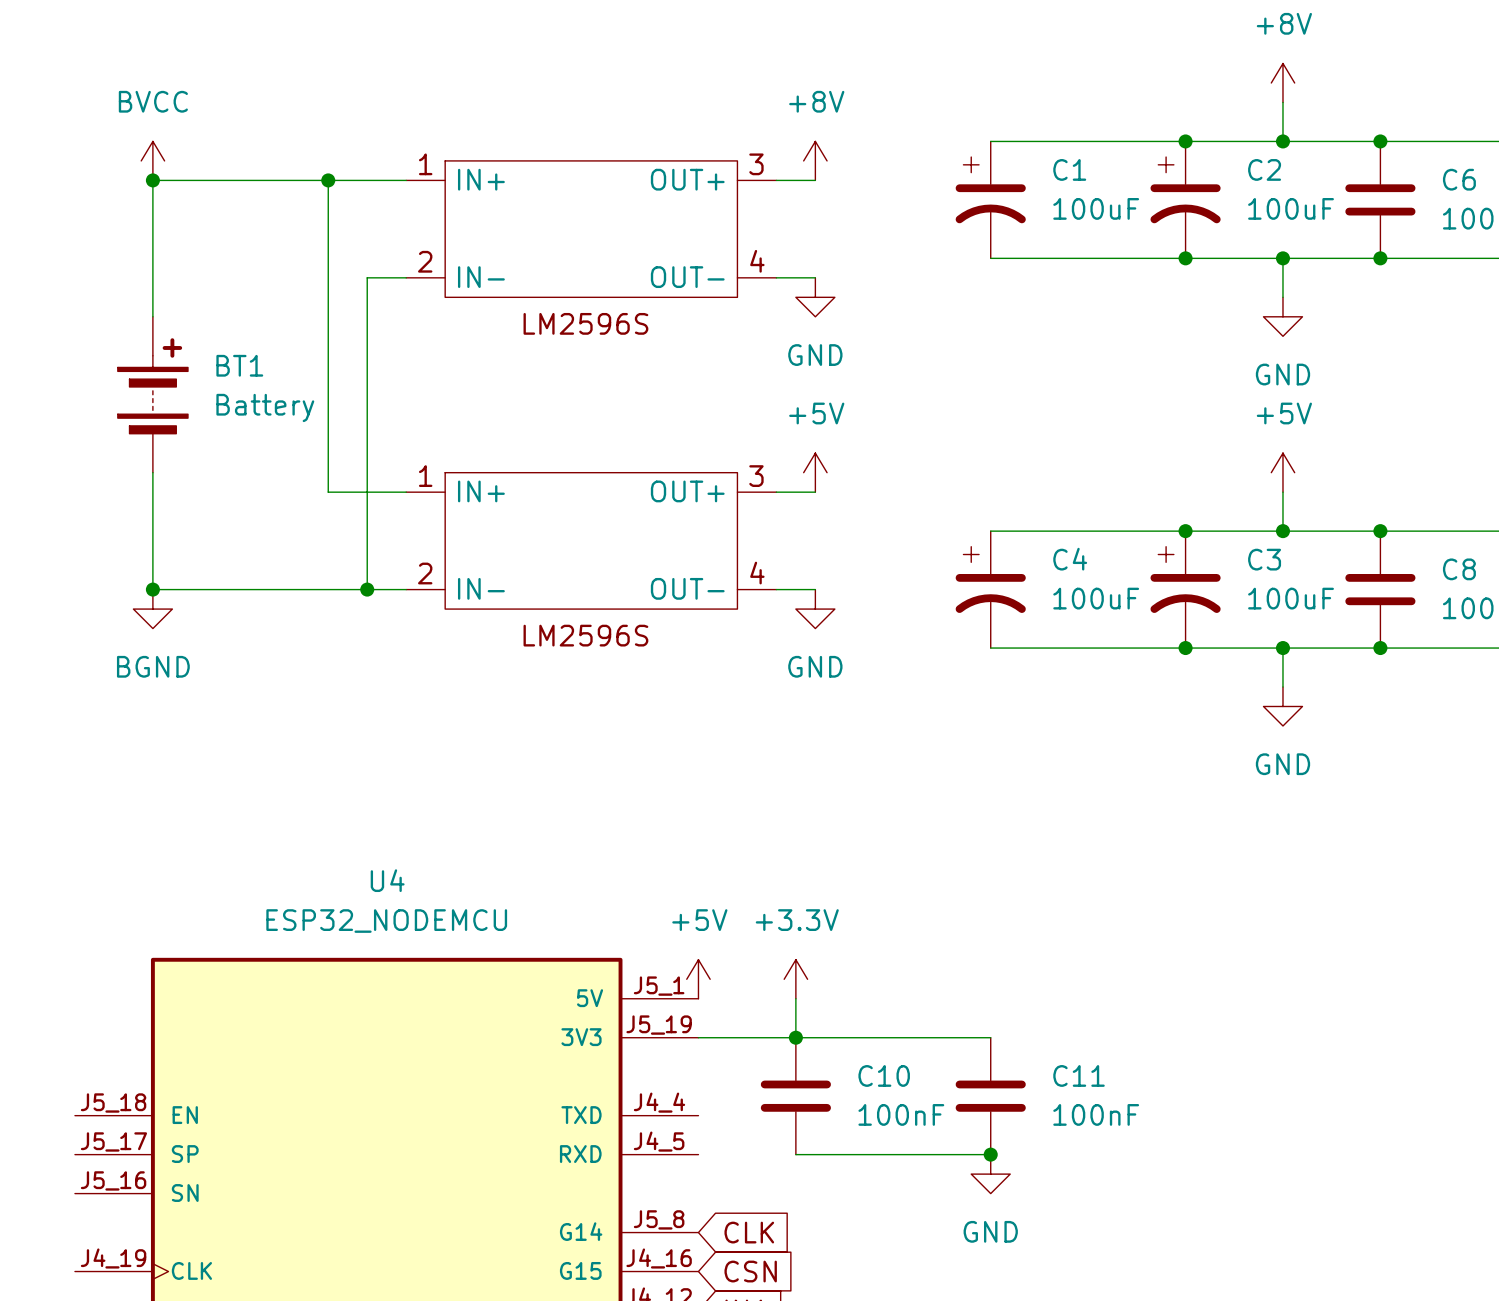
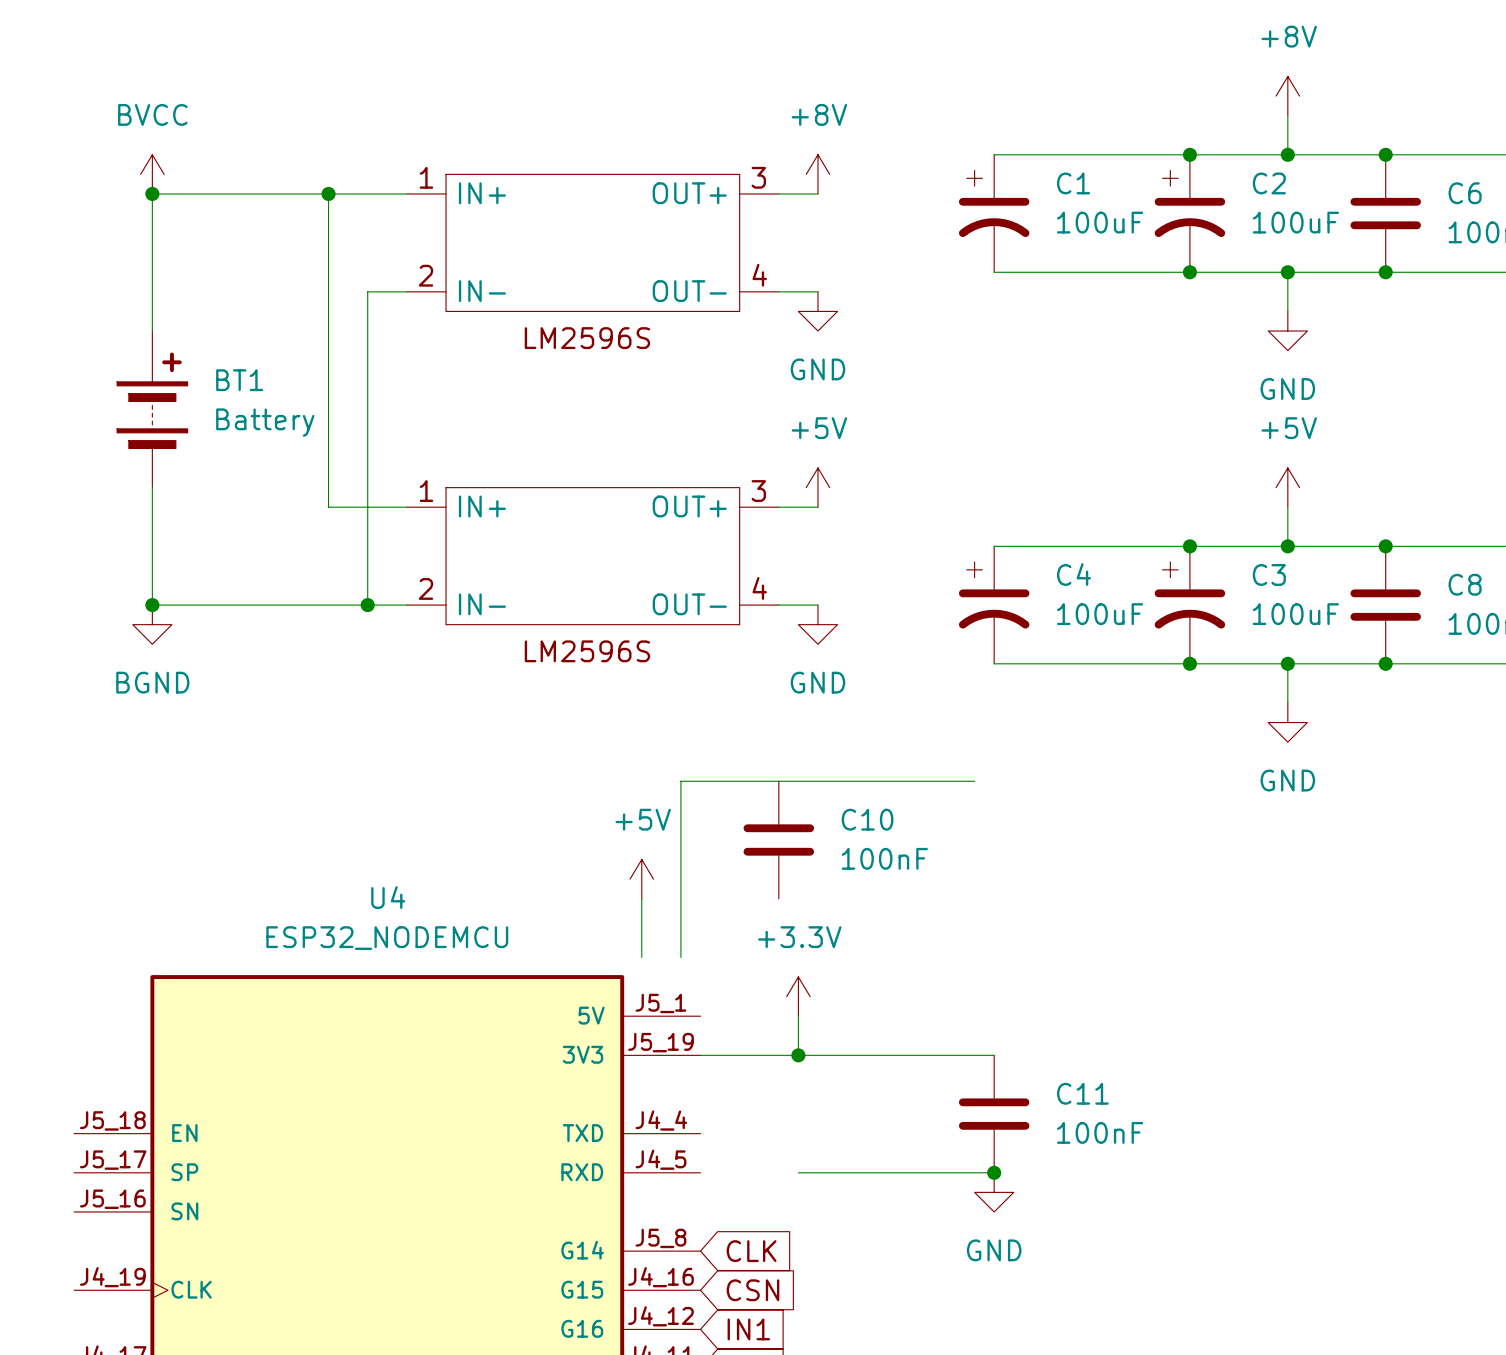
wire: none -> (974, 781) (680, 781) (680, 957)
wire: none -> (641, 898) (641, 957)
power symbol position: +5V (698, 979) -> +5V (641, 879)
C10 position: (795, 1096) -> (778, 840)

